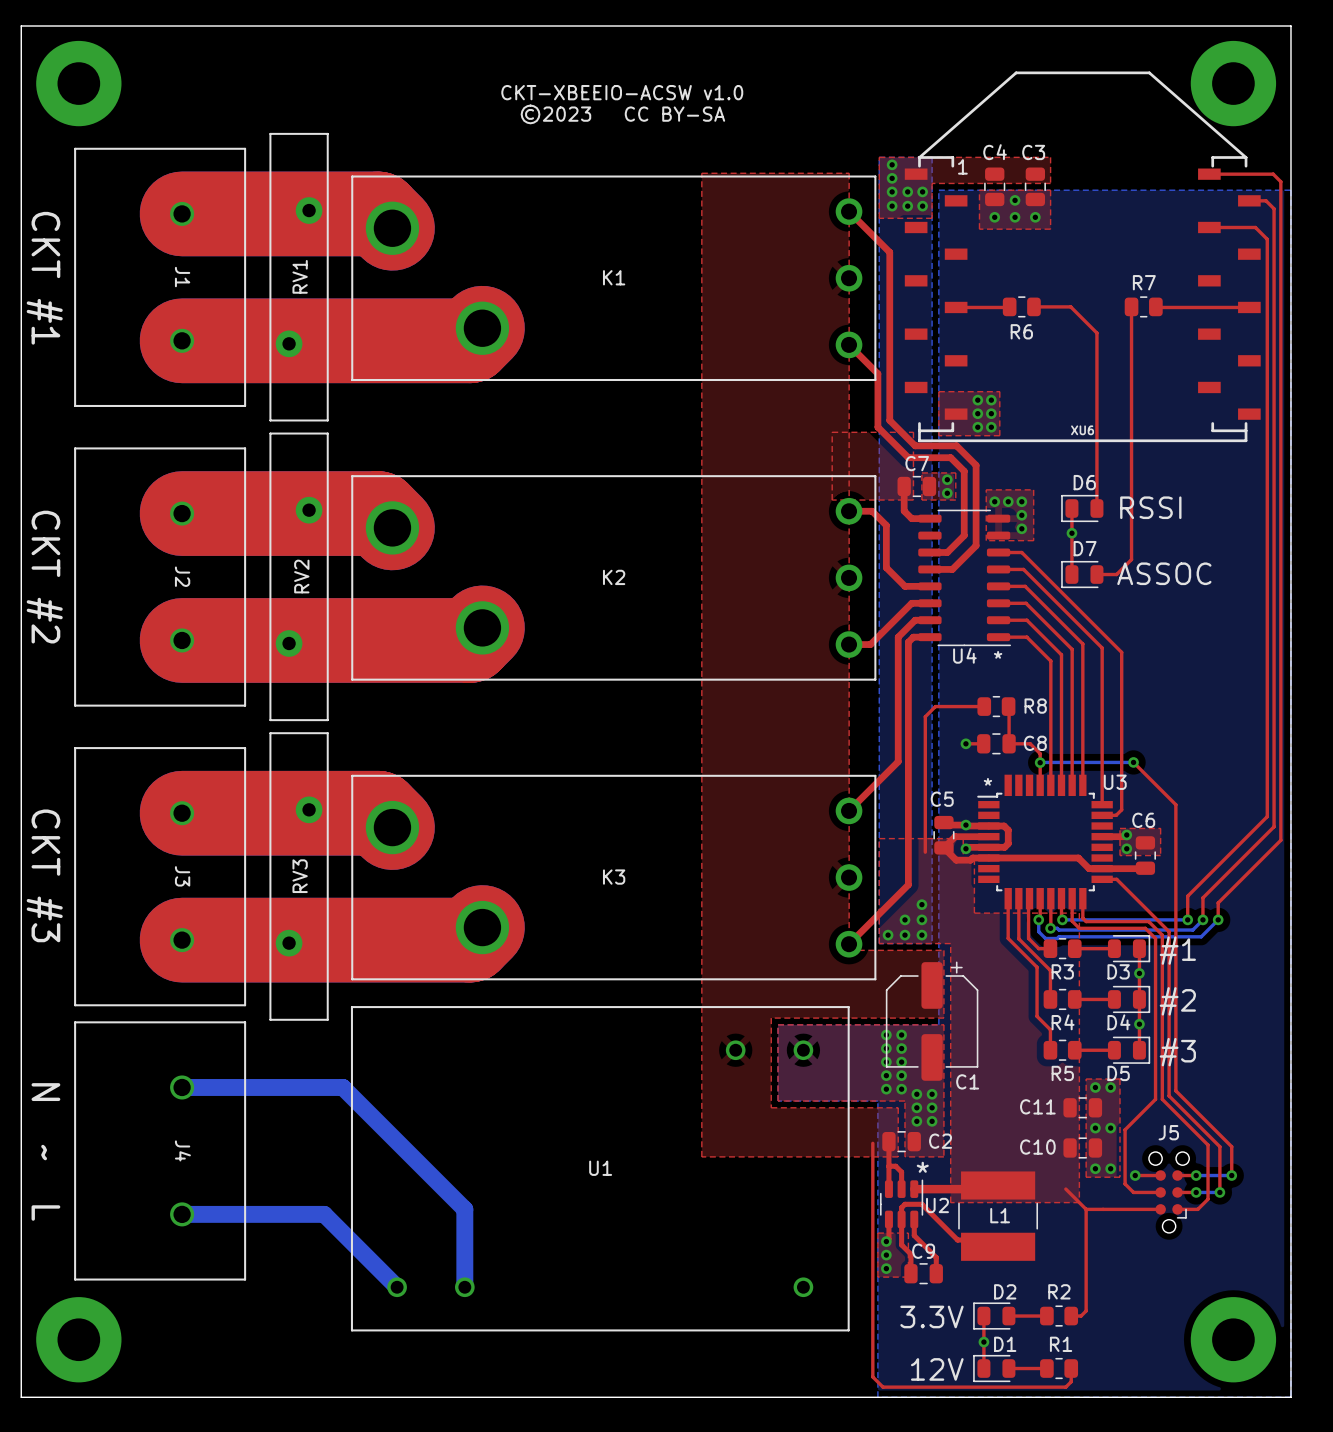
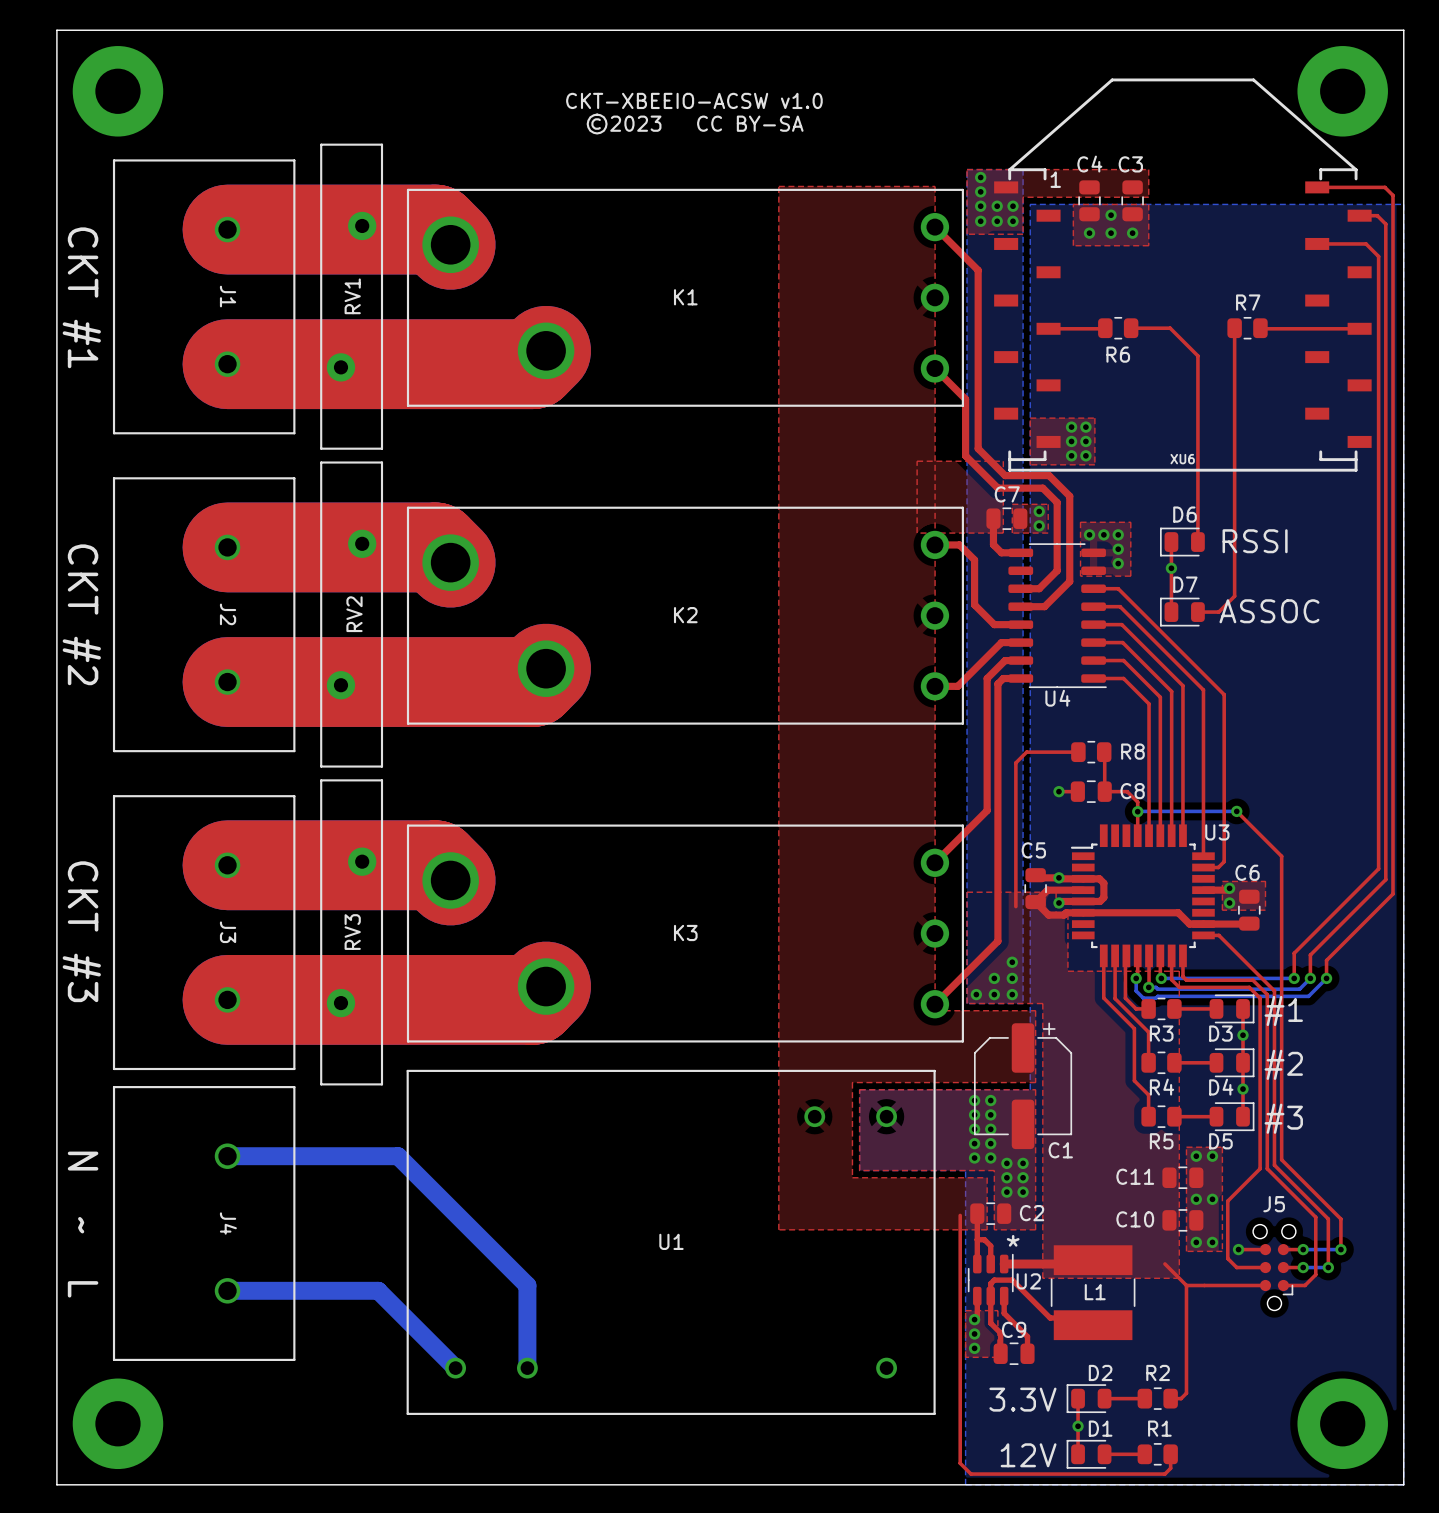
text: * (998, 654) -> none
text: * (987, 781) -> none

